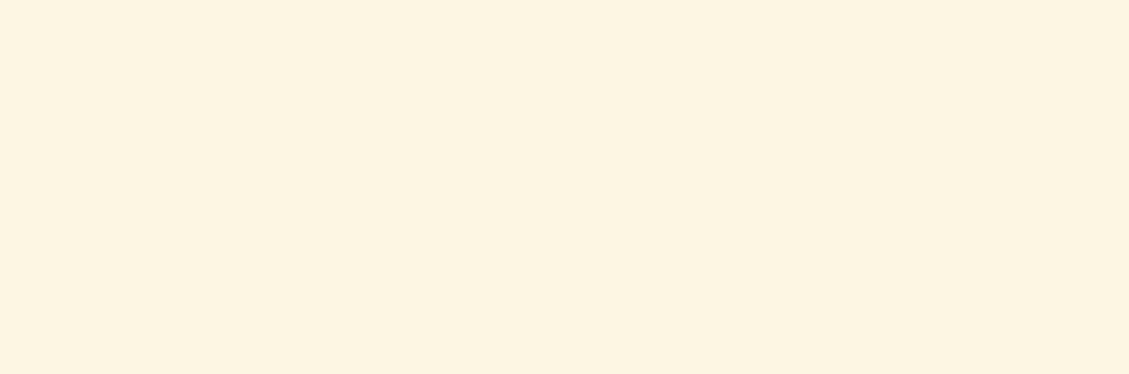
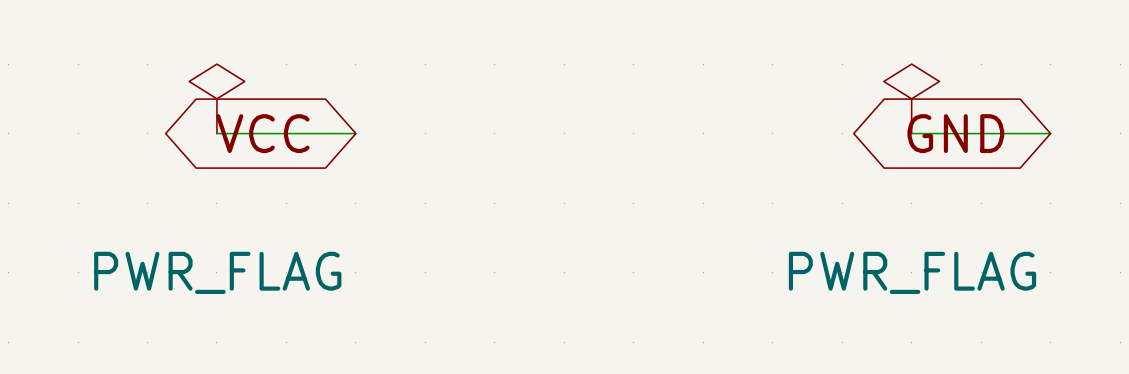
power symbol: none -> PWR_FLAG (216, 98)
power symbol: none -> PWR_FLAG (911, 98)
wire: none -> (216, 133) (355, 133)
global label: none -> VCC (262, 133)
wire: none -> (911, 133) (1050, 133)
global label: none -> GND (955, 133)

